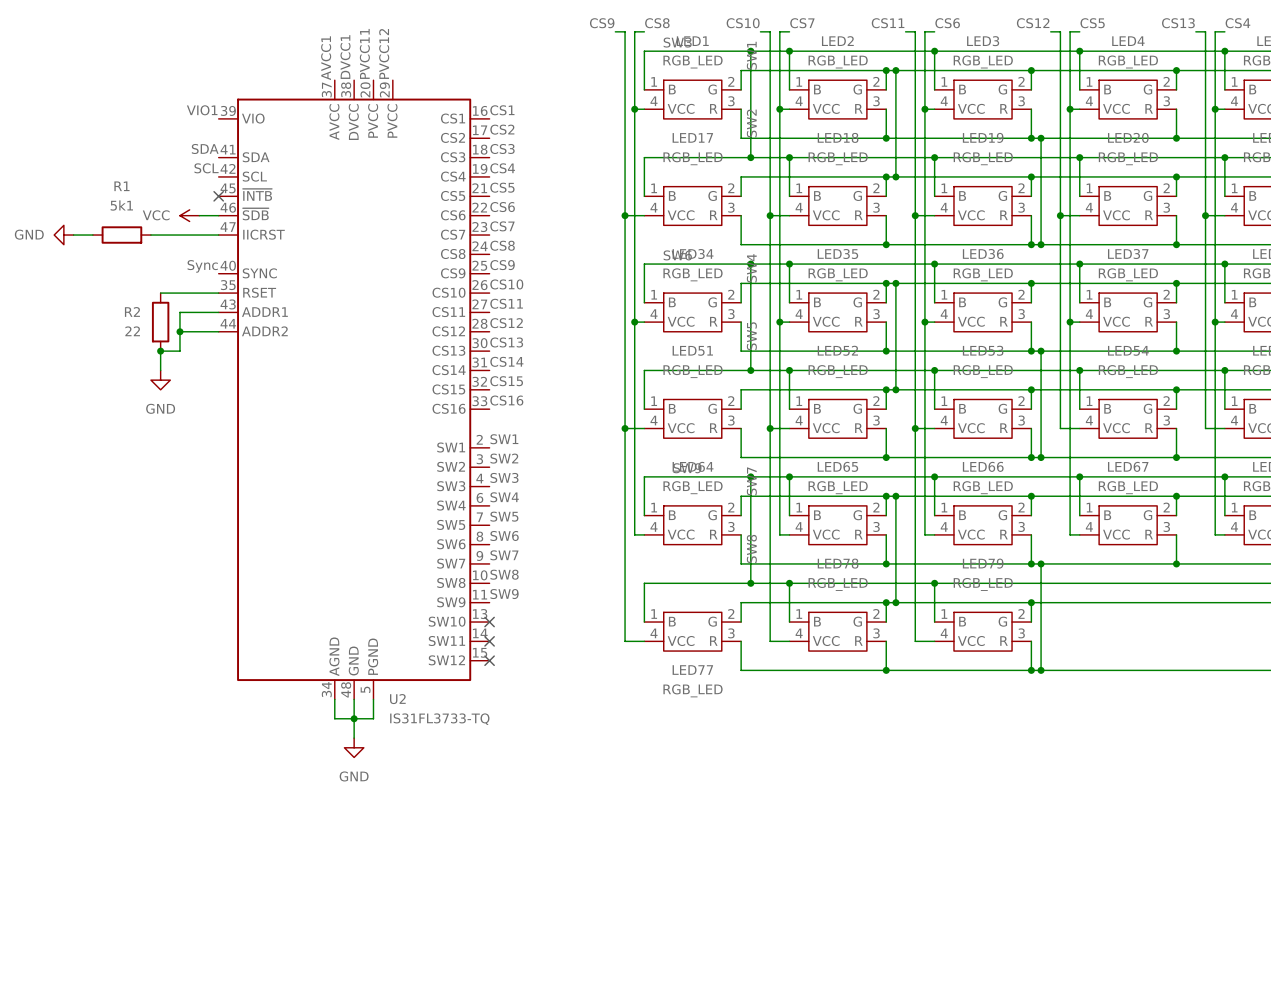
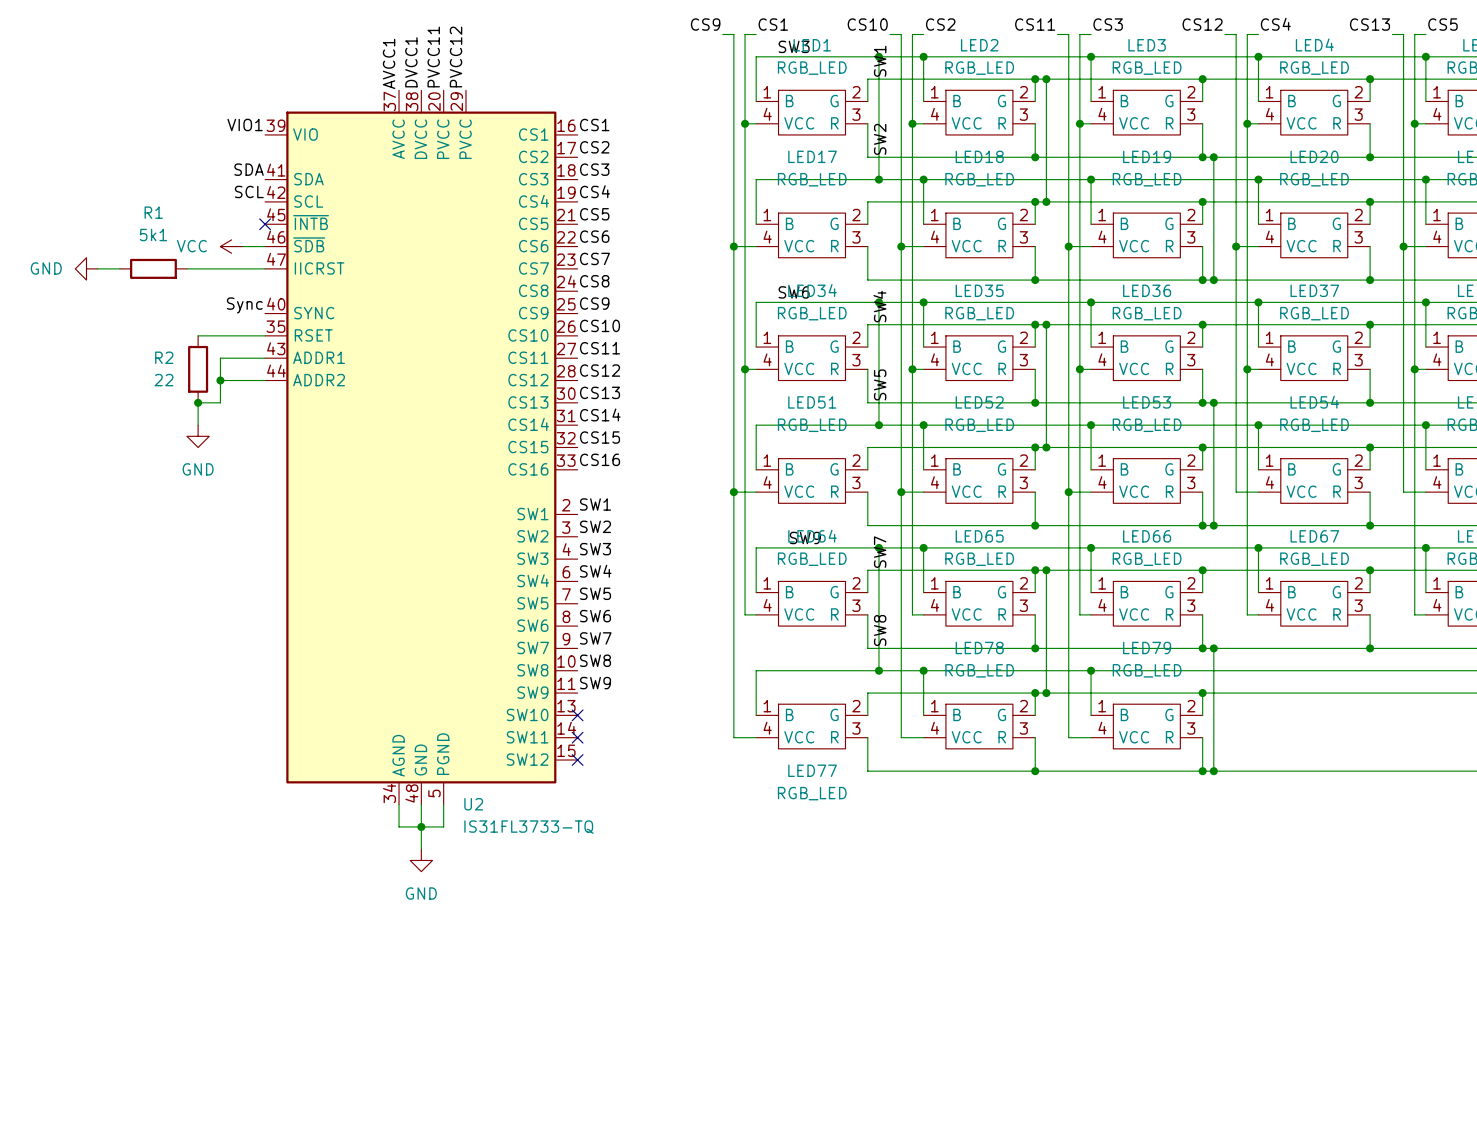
label: CS8 (657, 23) -> CS1 (773, 24)
label: CS7 (802, 23) -> CS2 (940, 24)
label: CS6 (947, 23) -> CS3 (1108, 24)
label: CS5 (1092, 23) -> CS4 (1275, 24)
label: CS4 (1237, 23) -> CS5 (1442, 24)

